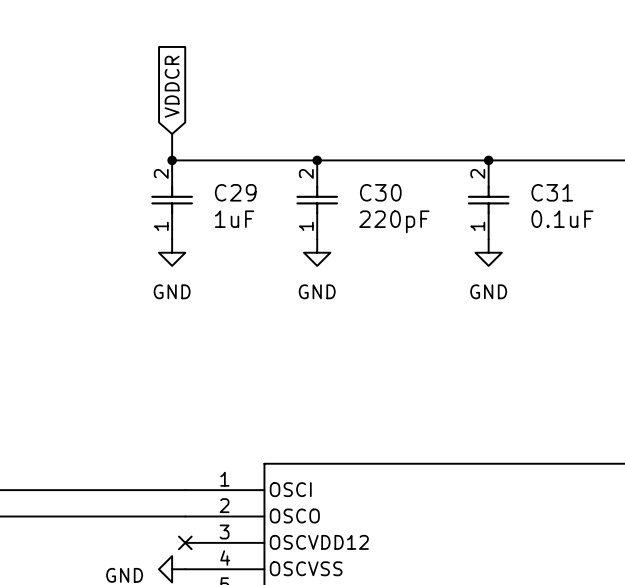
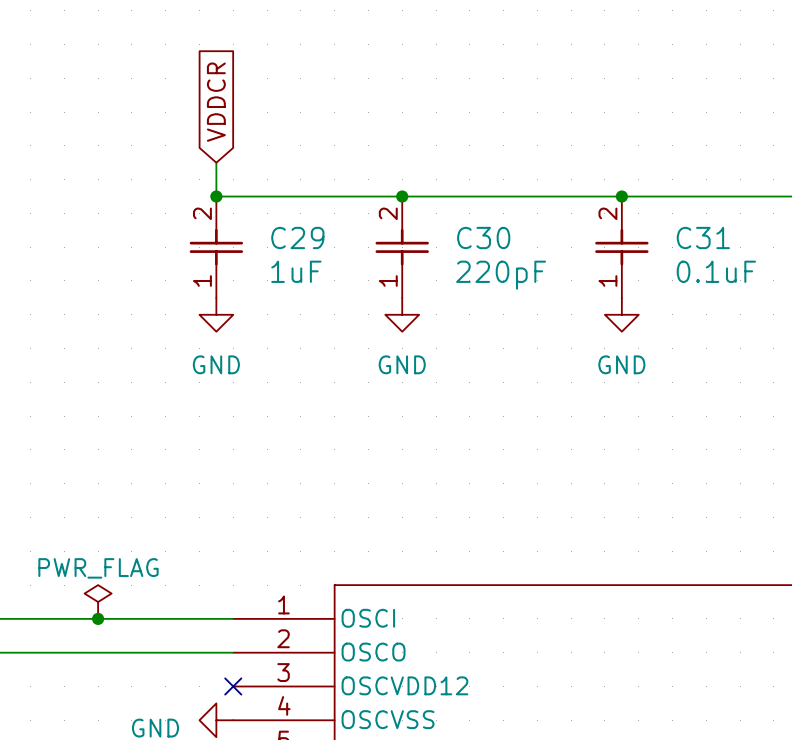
power symbol: none -> PWR_FLAG (98, 602)
junction: none -> (98, 618)

